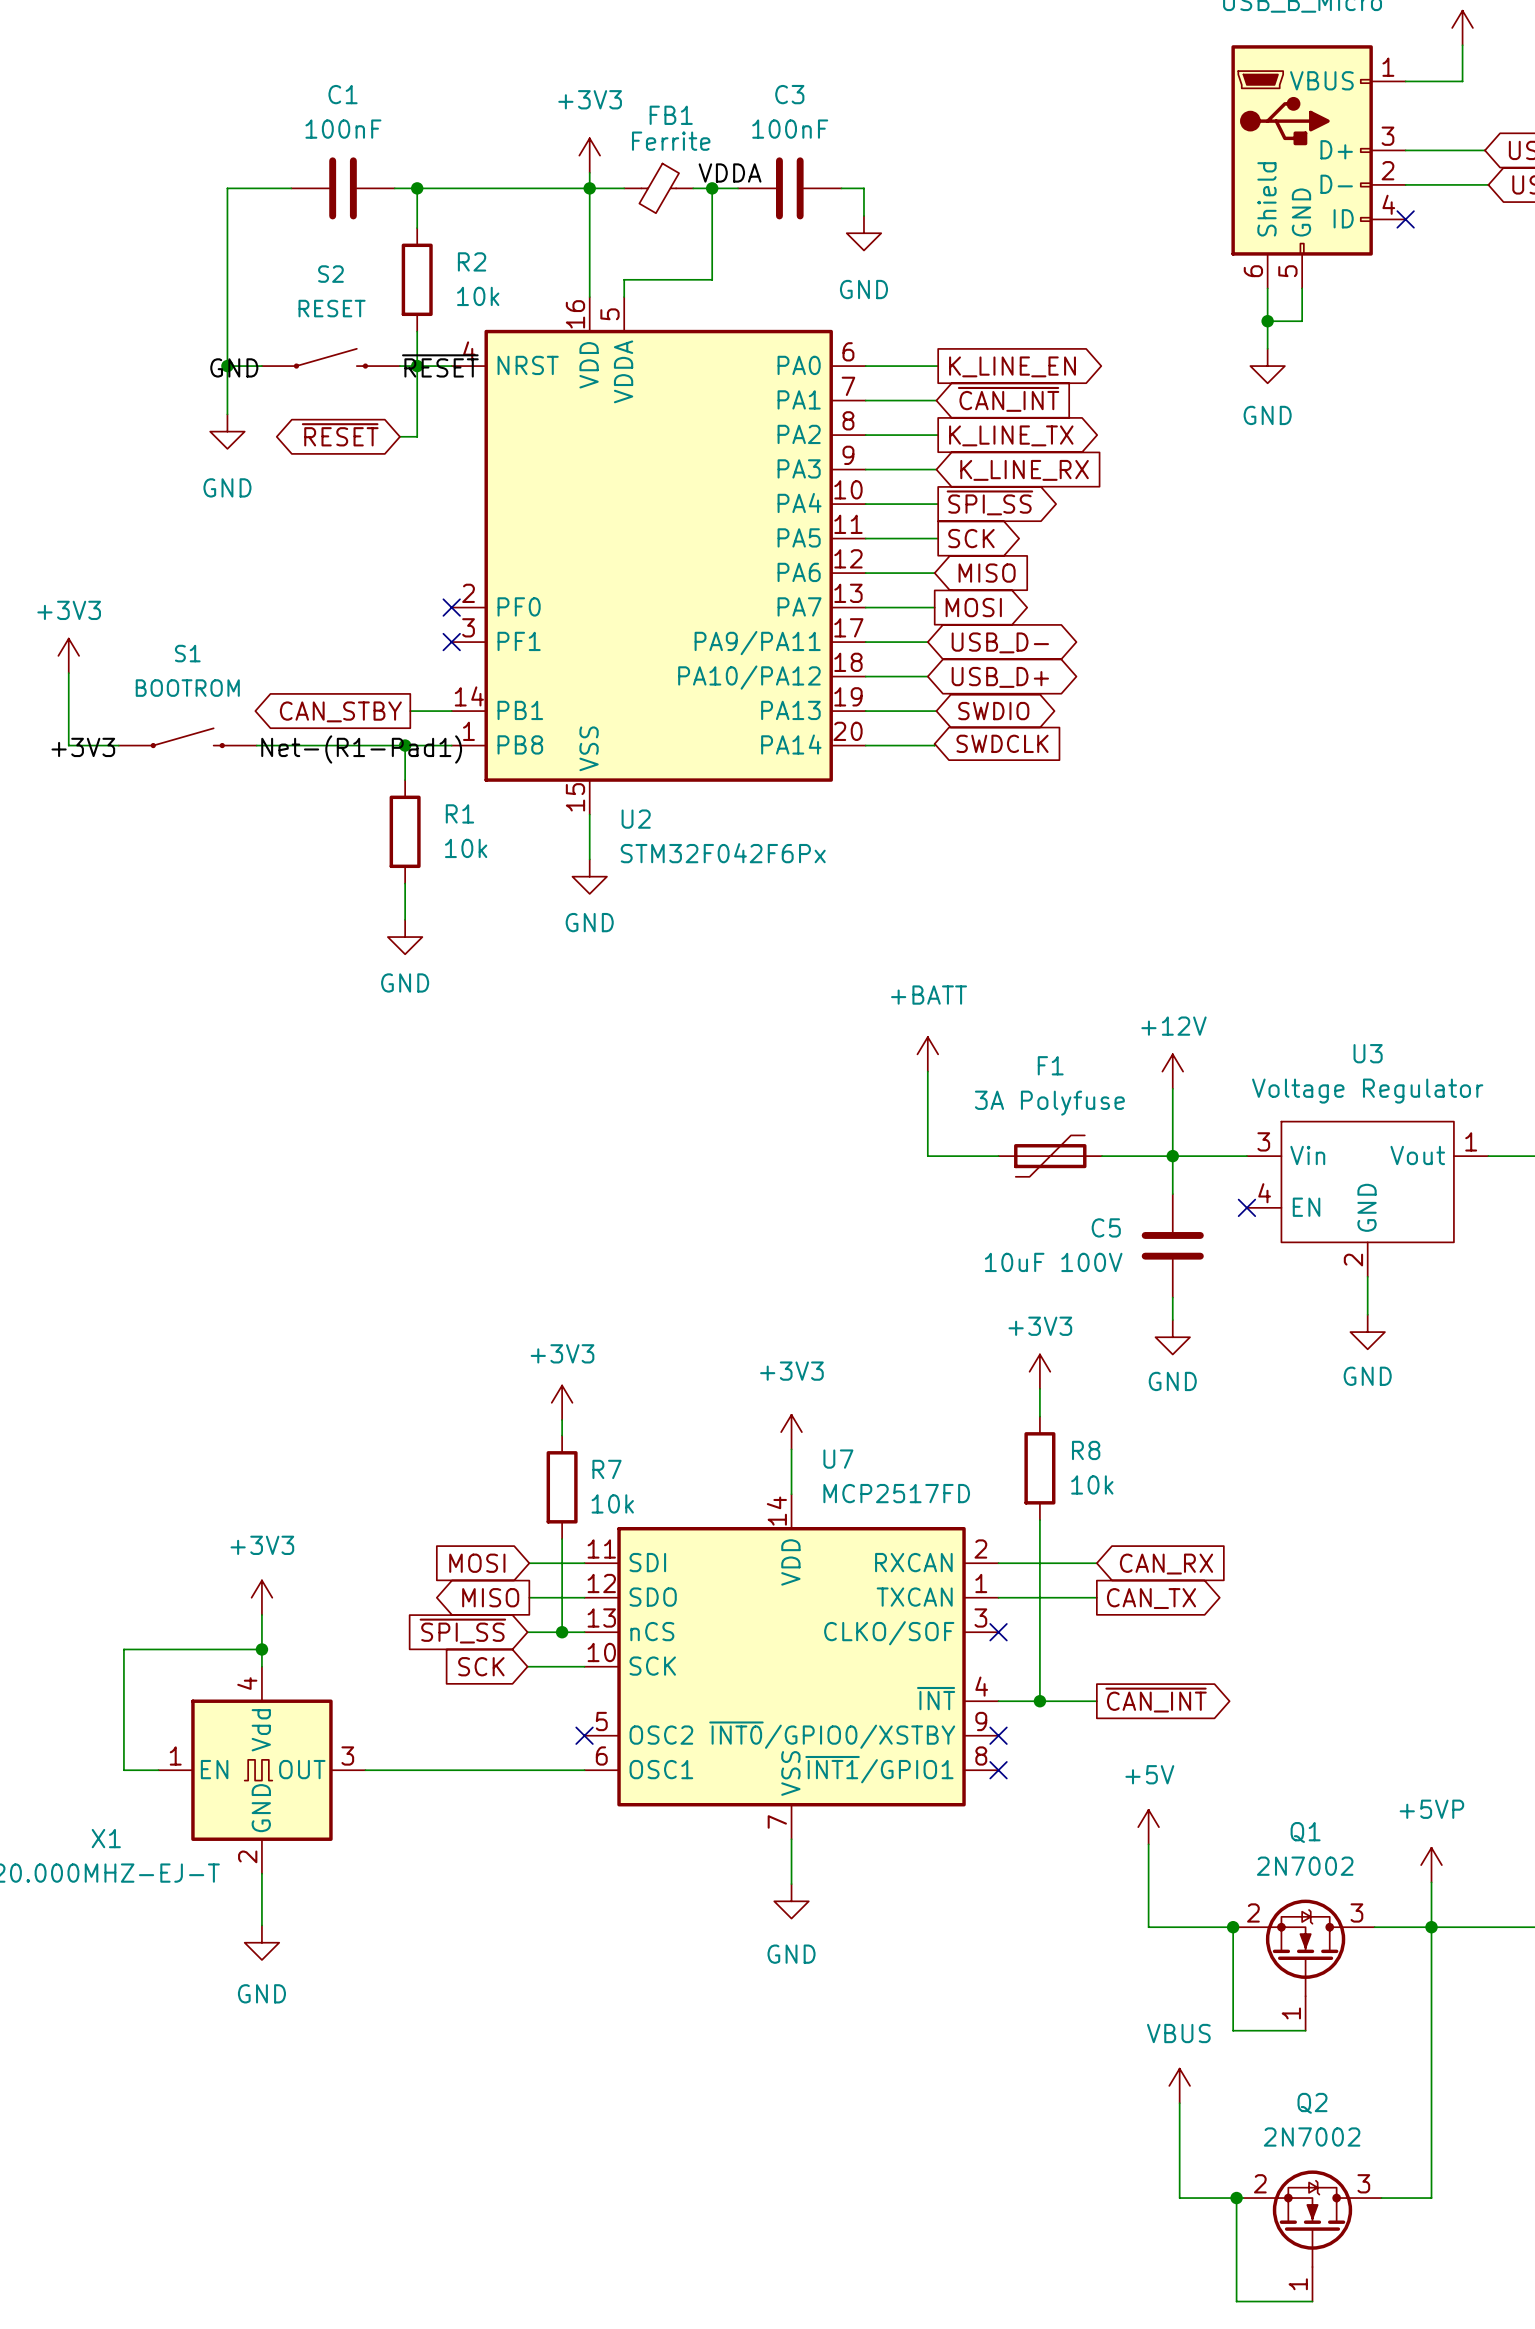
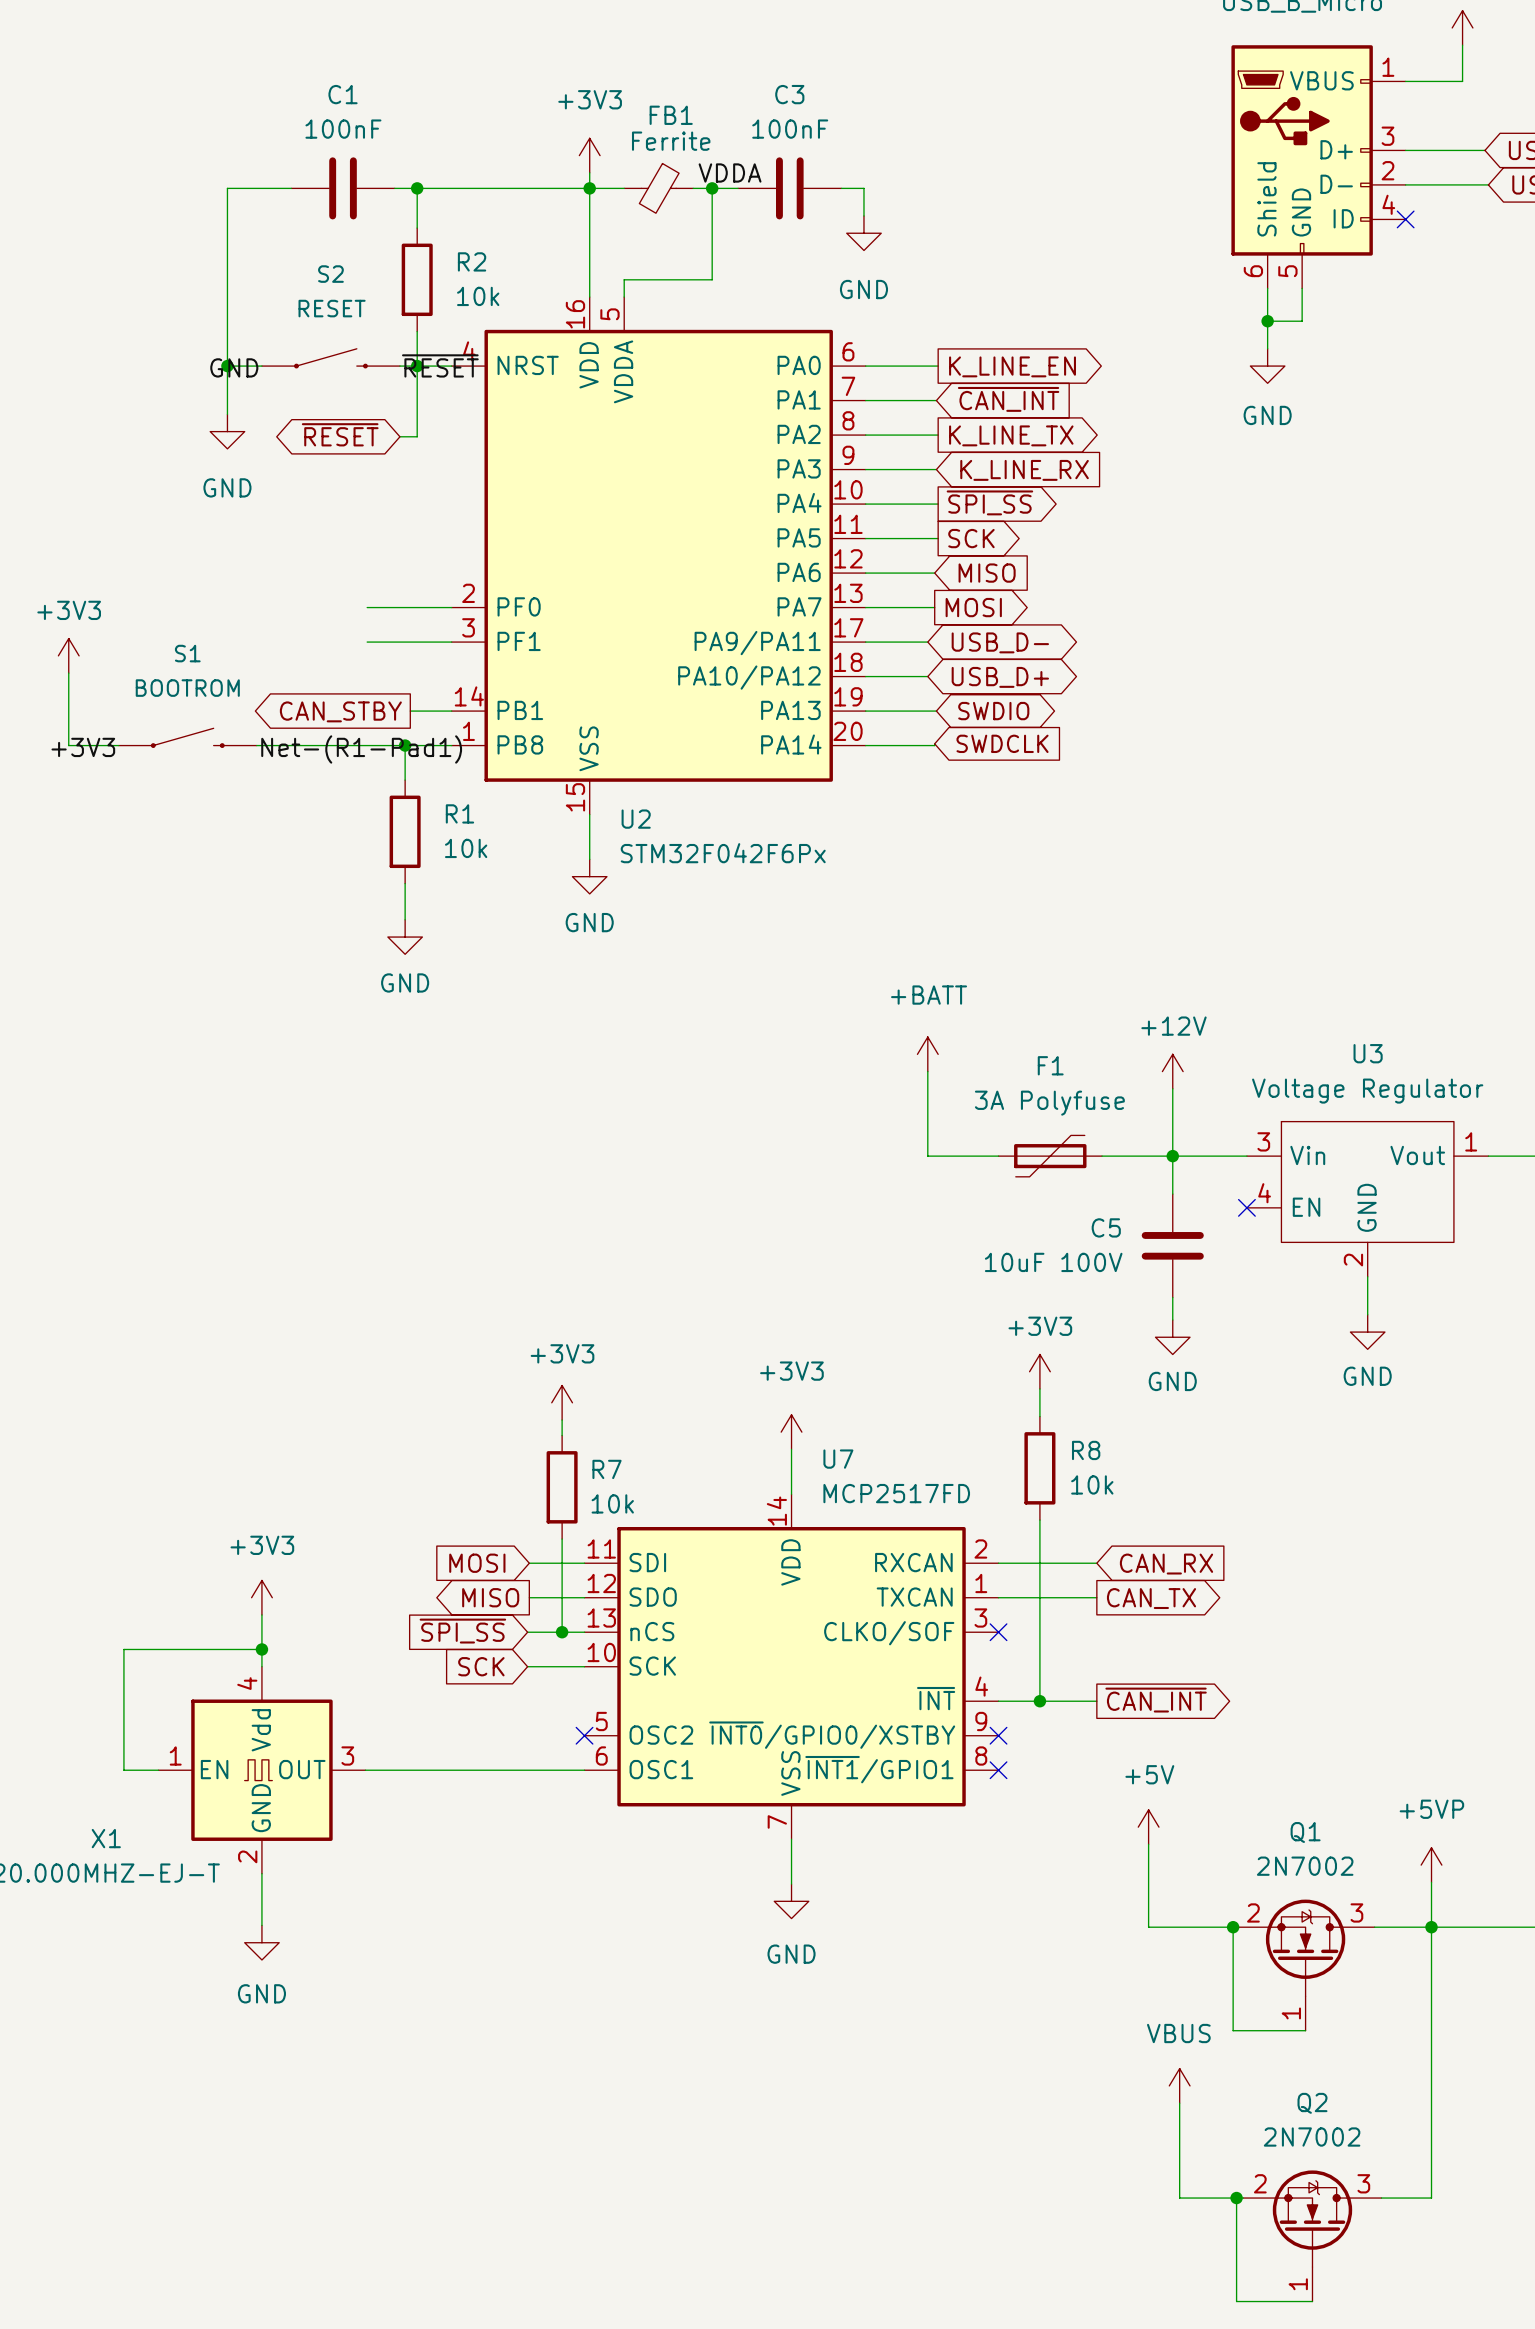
wire: none -> (367, 607) (451, 607)
no-connect mark: (451, 607) -> none
wire: none -> (367, 642) (451, 642)
no-connect mark: (451, 642) -> none

